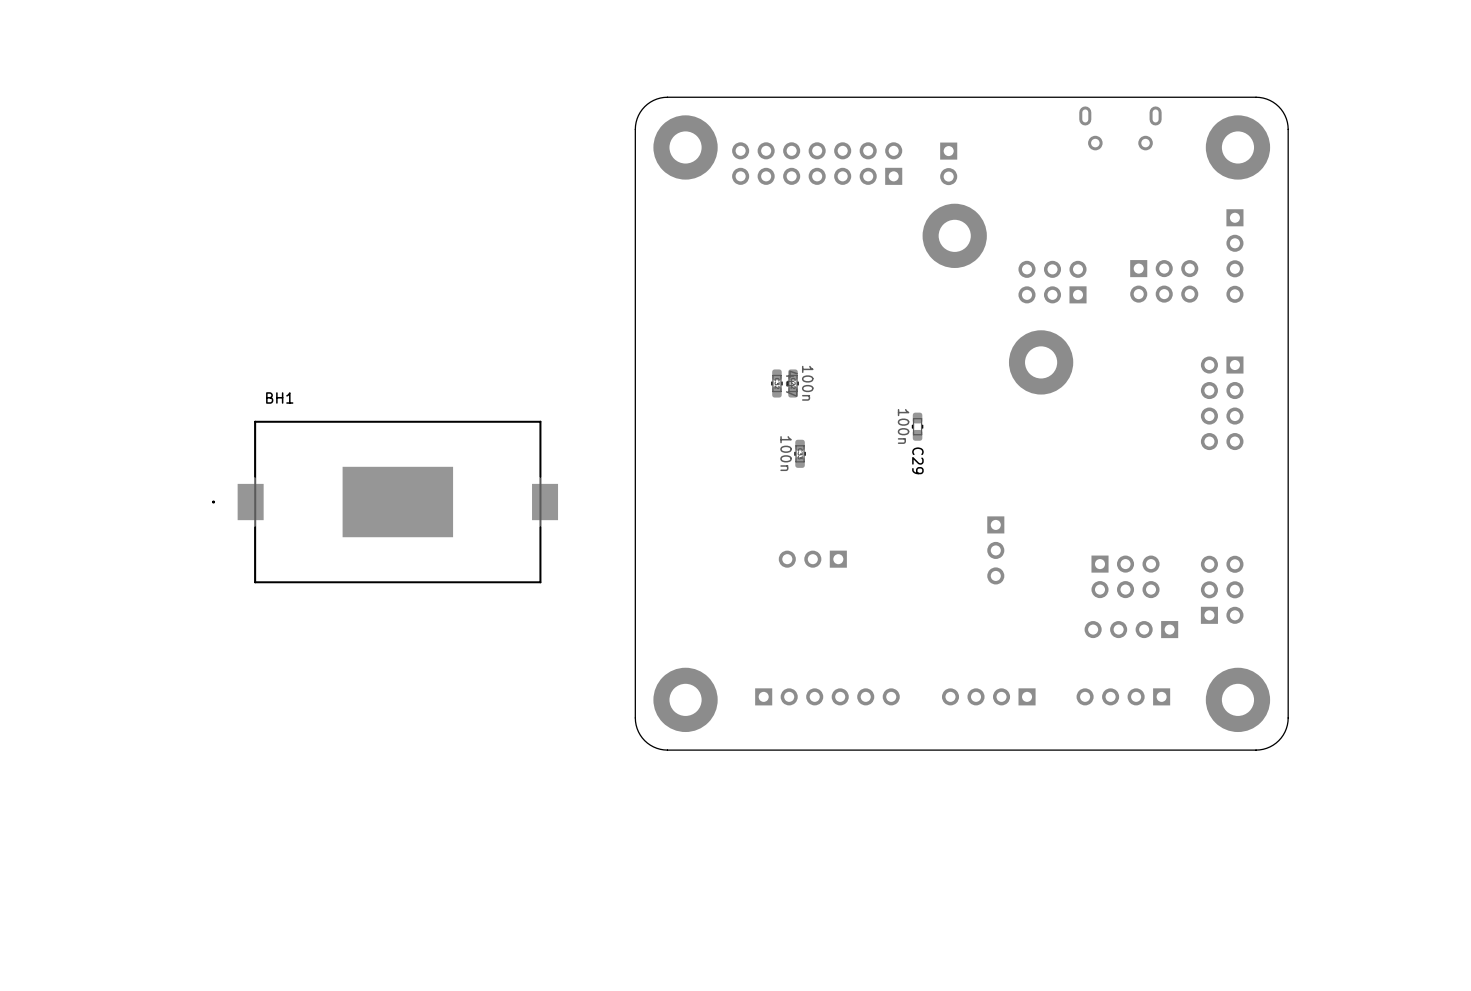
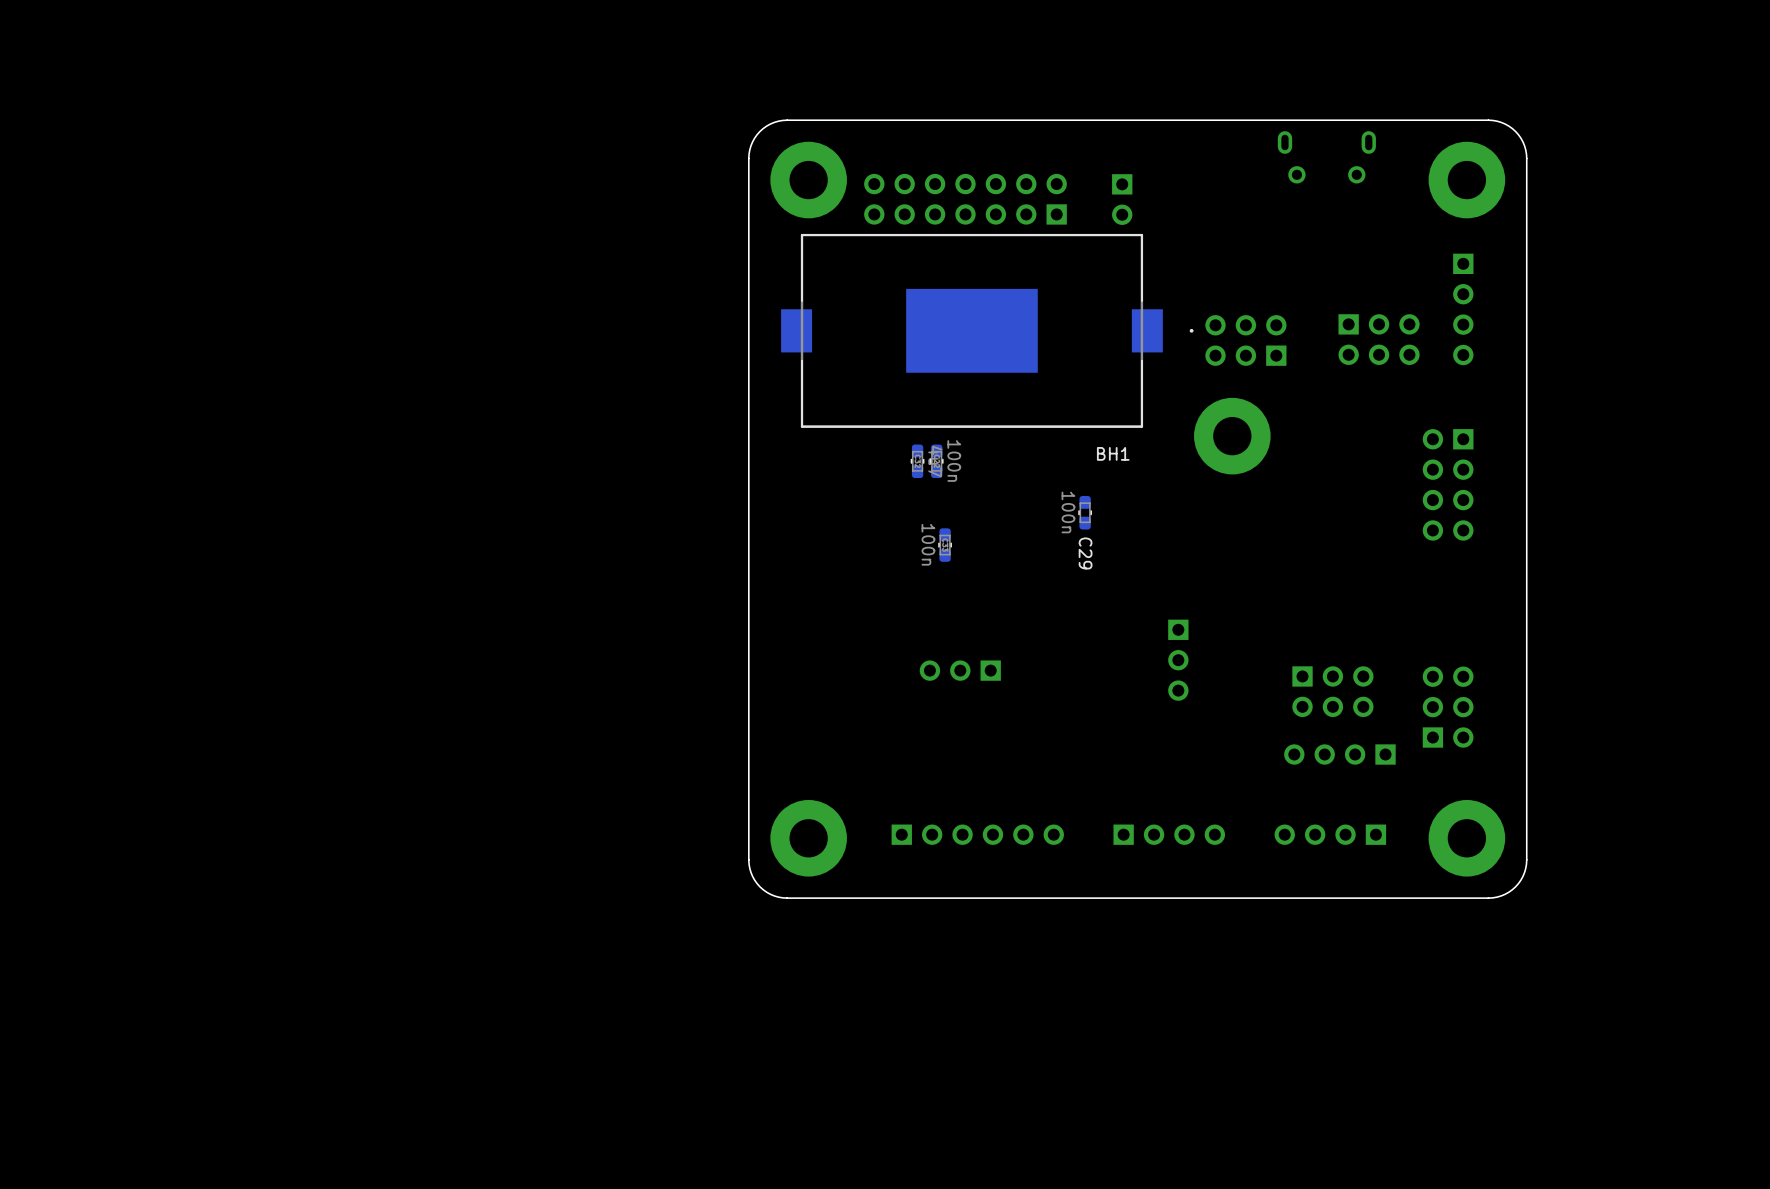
part: (954, 235) -> none
BH1 rotation: 0° (385, 502) -> 180° (987, 330)
BH1 position: (385, 502) -> (987, 330)
part rotation: 0° (988, 696) -> 180° (1169, 834)

